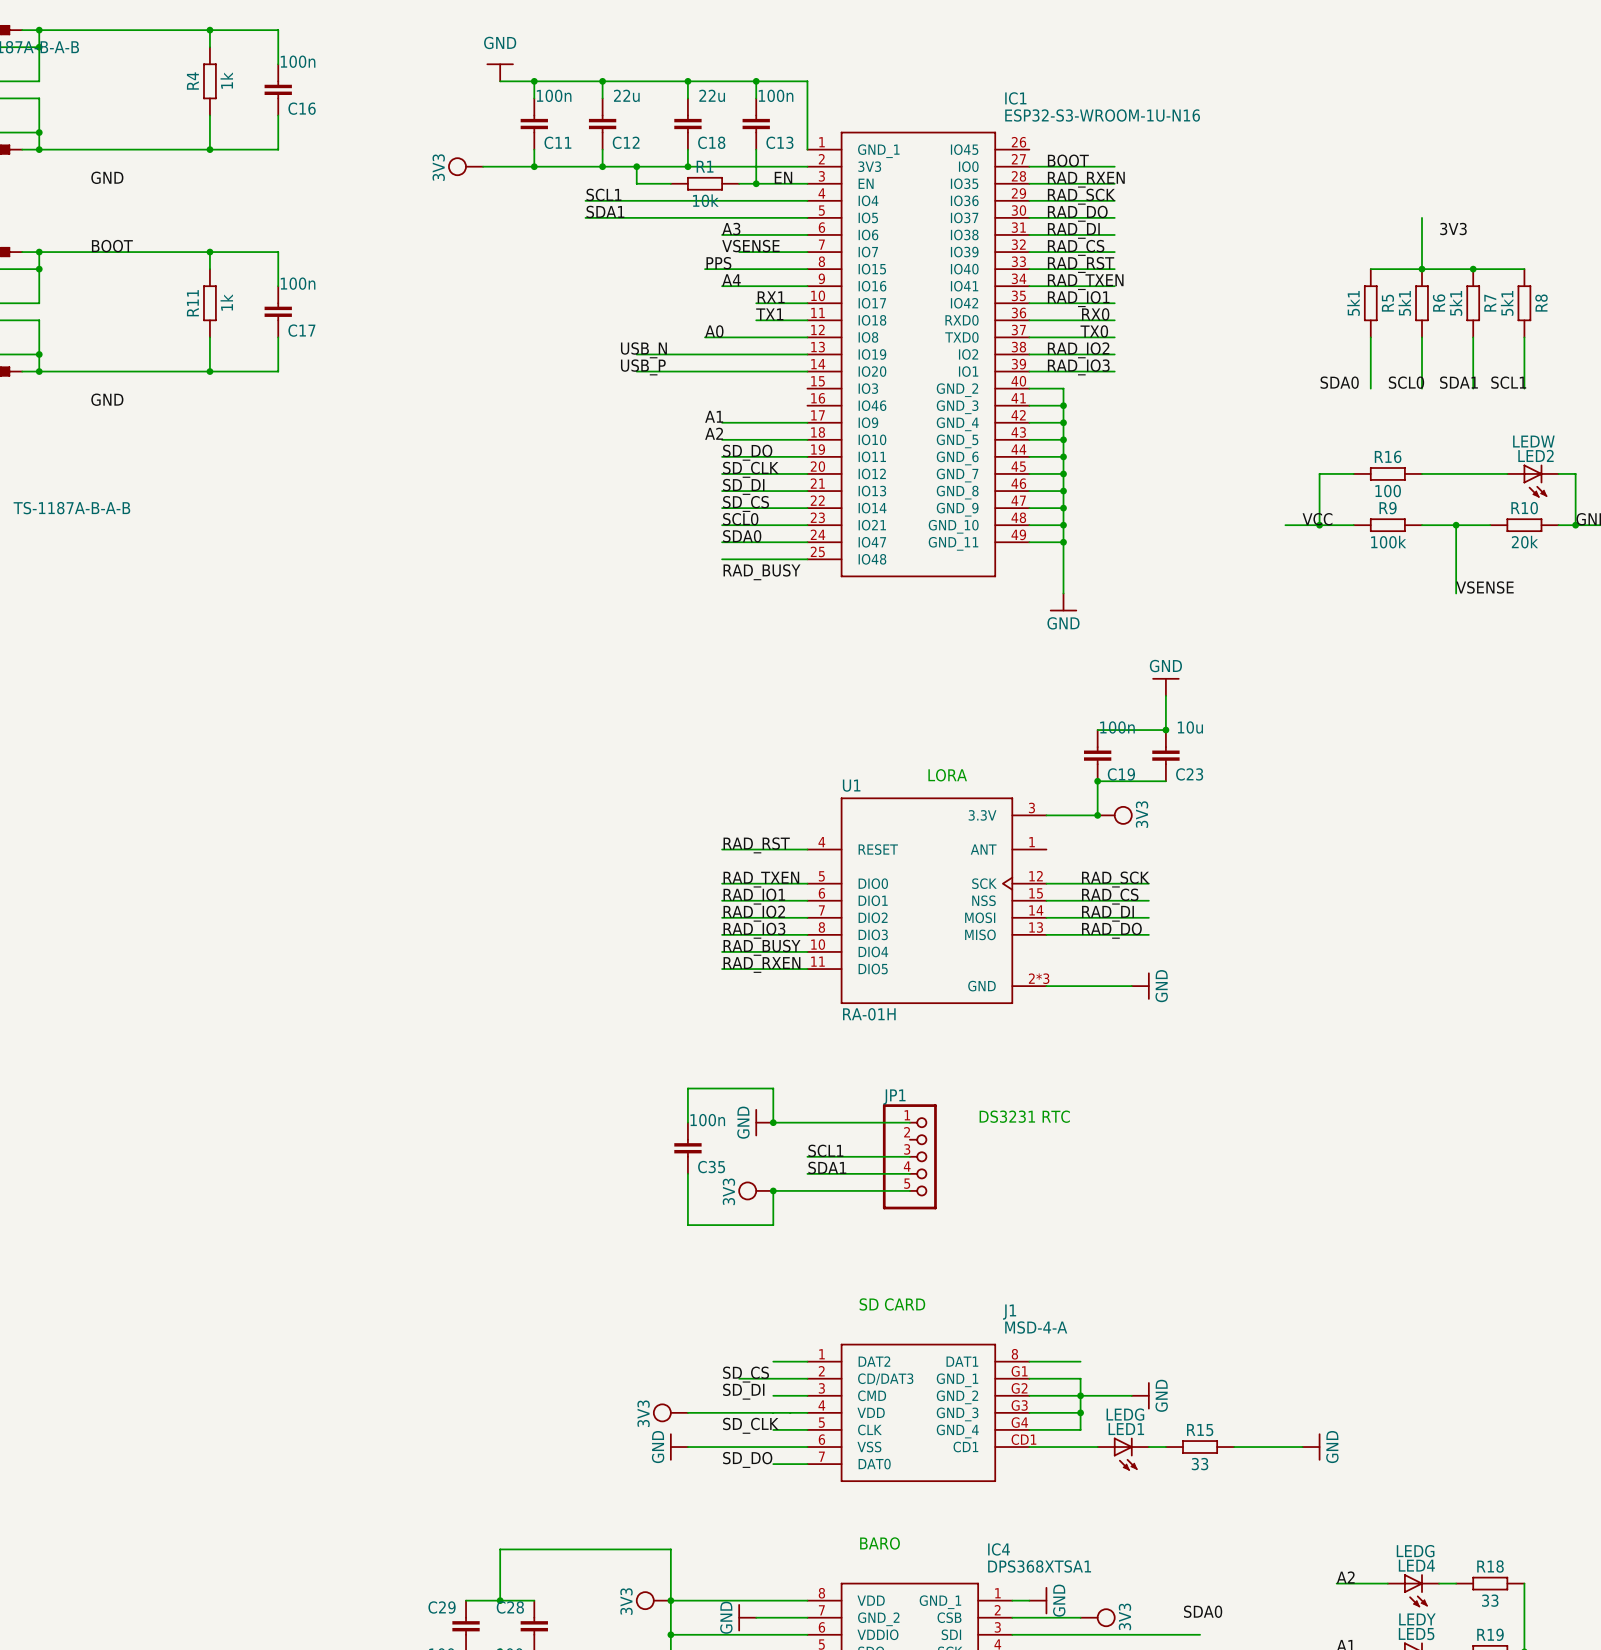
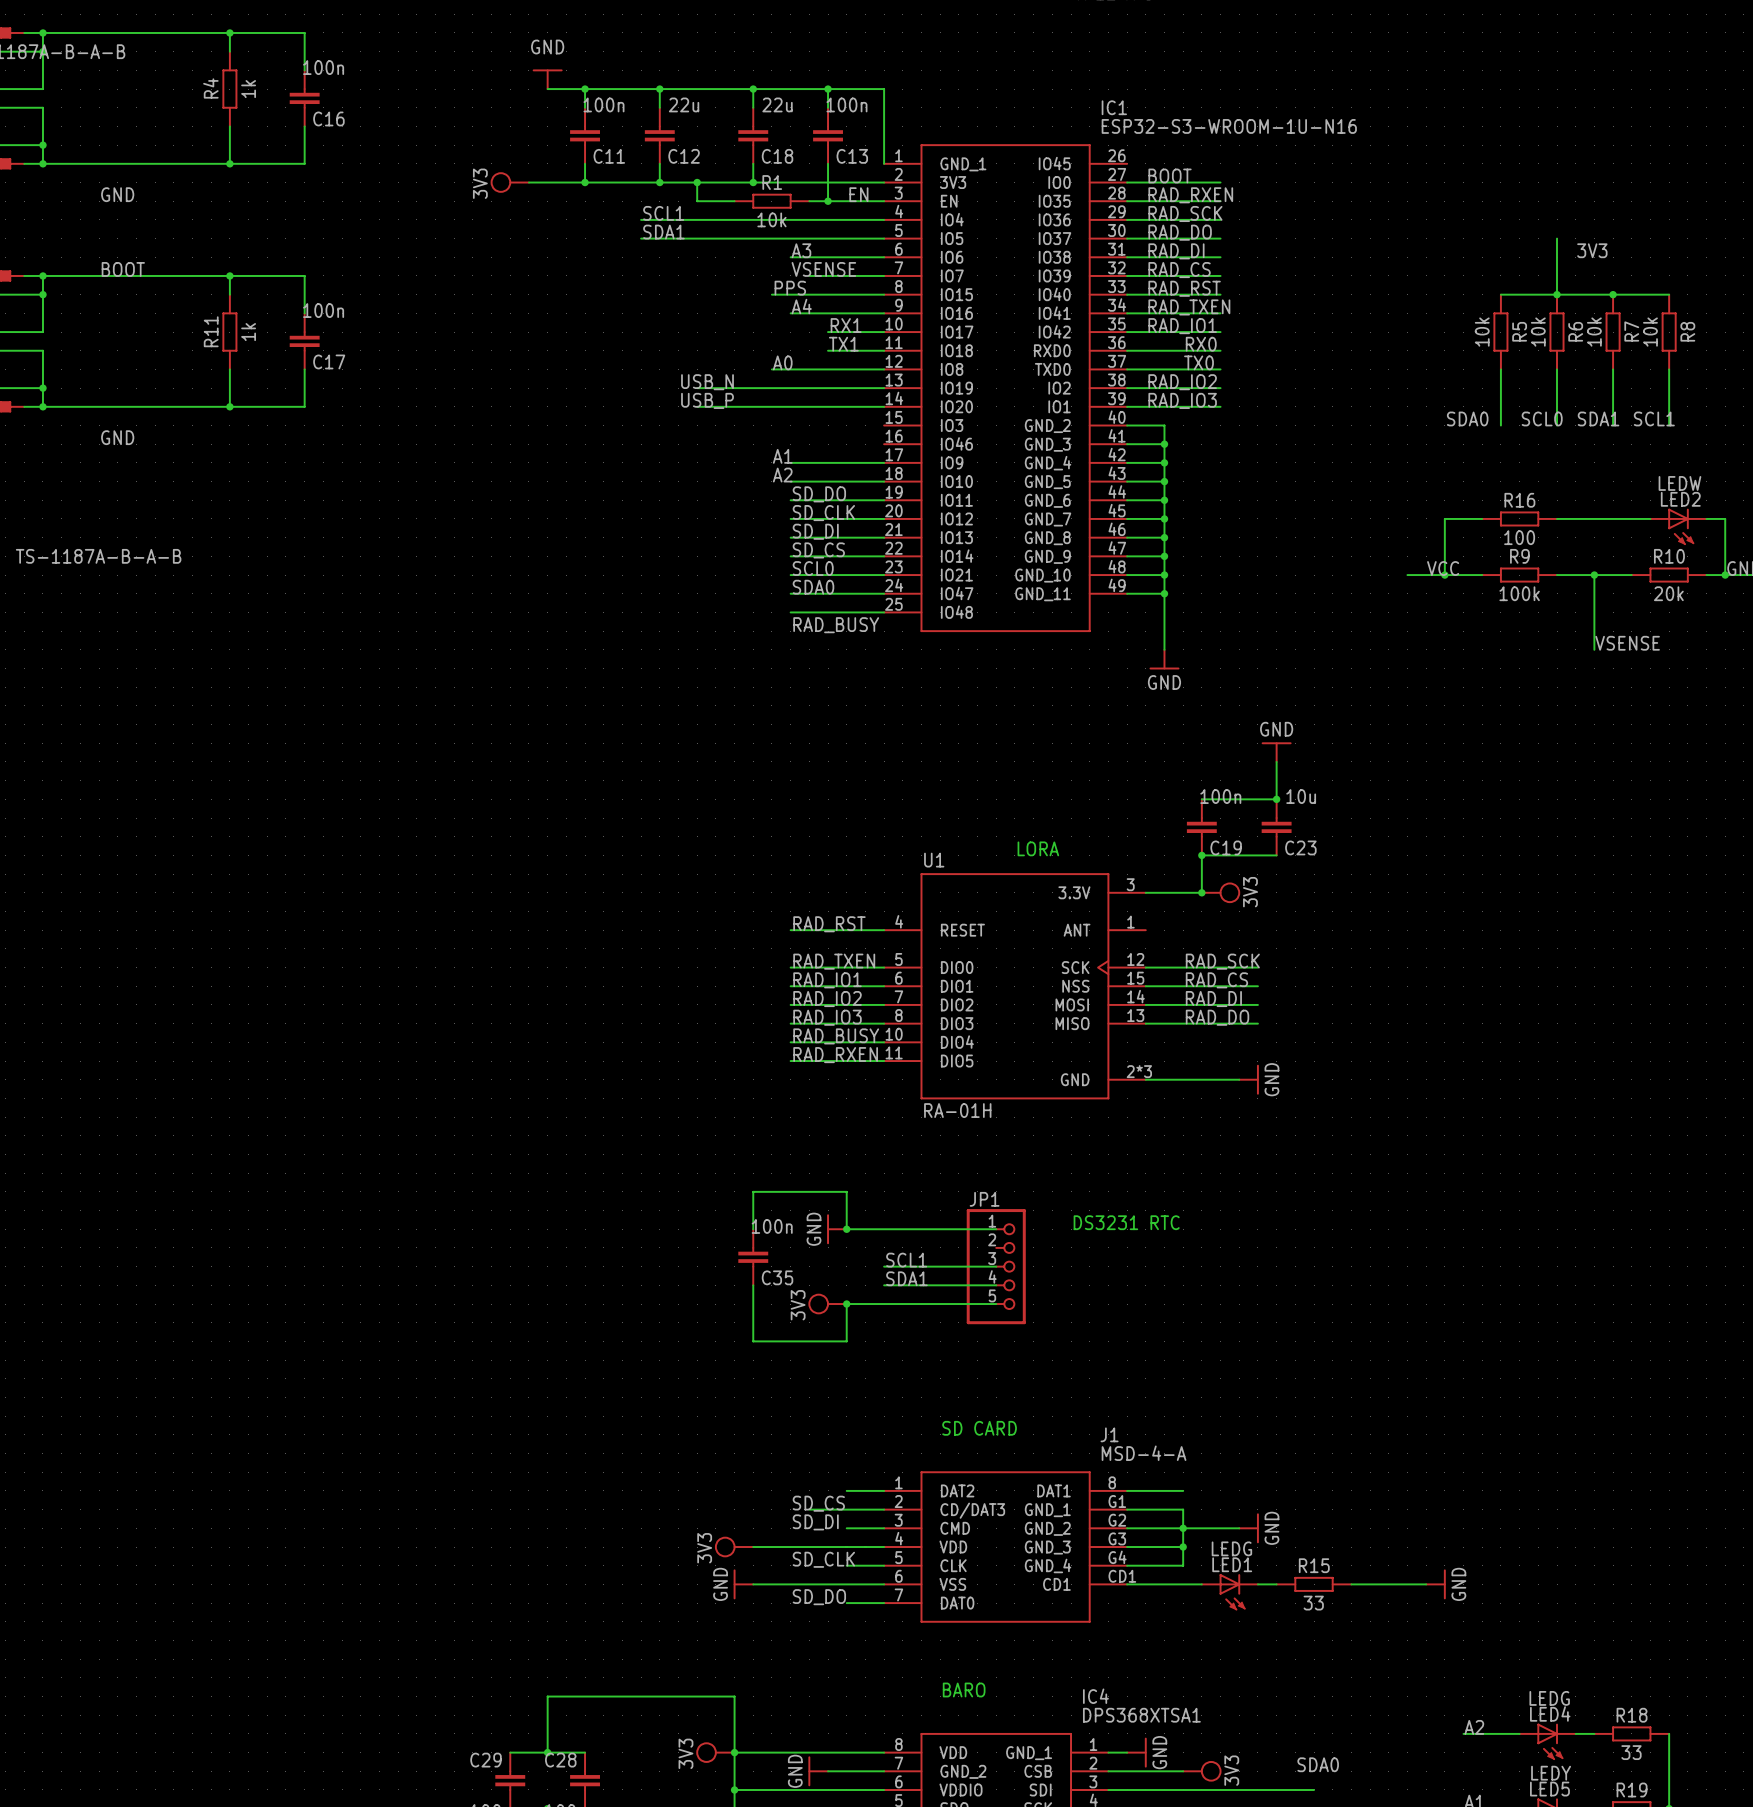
R5 value: 5k1 (1353, 303) -> 10k (1482, 332)
R6 value: 5k1 (1404, 303) -> 10k (1538, 332)
R7 value: 5k1 (1456, 303) -> 10k (1594, 332)
R8 value: 5k1 (1507, 303) -> 10k (1650, 332)

